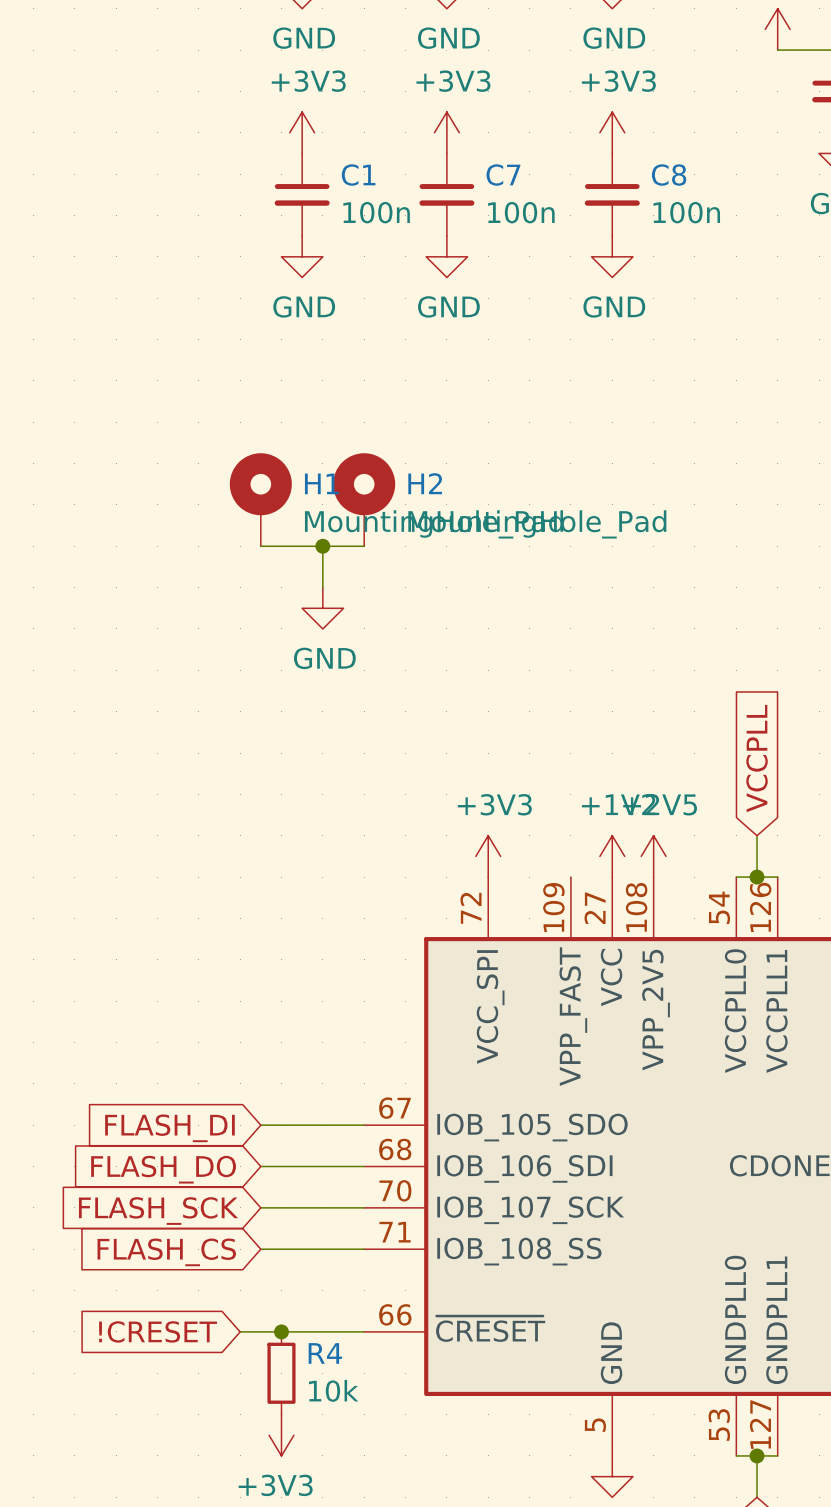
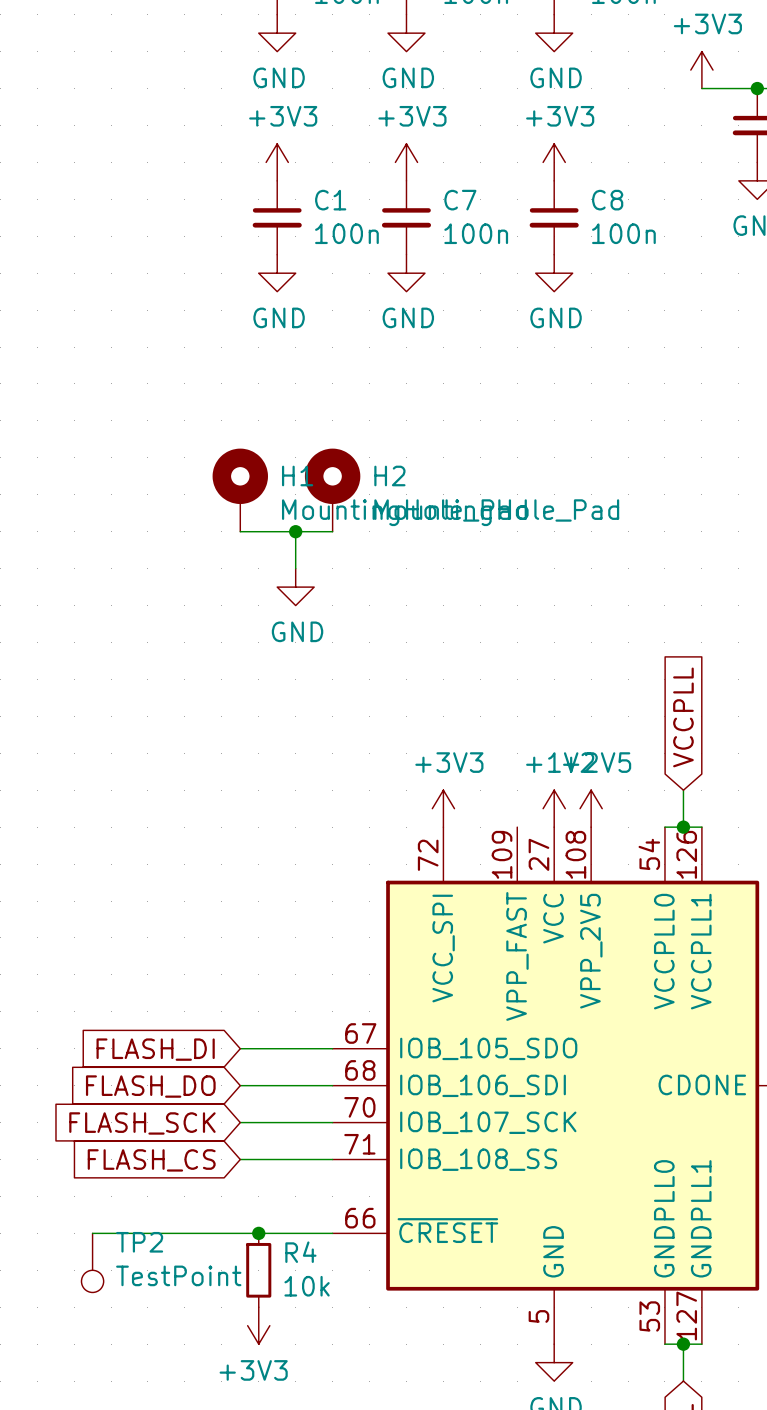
wire: none -> (92, 1233) (221, 1233)
global label: !CRESET (158, 1331) -> none
TP2: none -> TestPoint (92, 1262)

